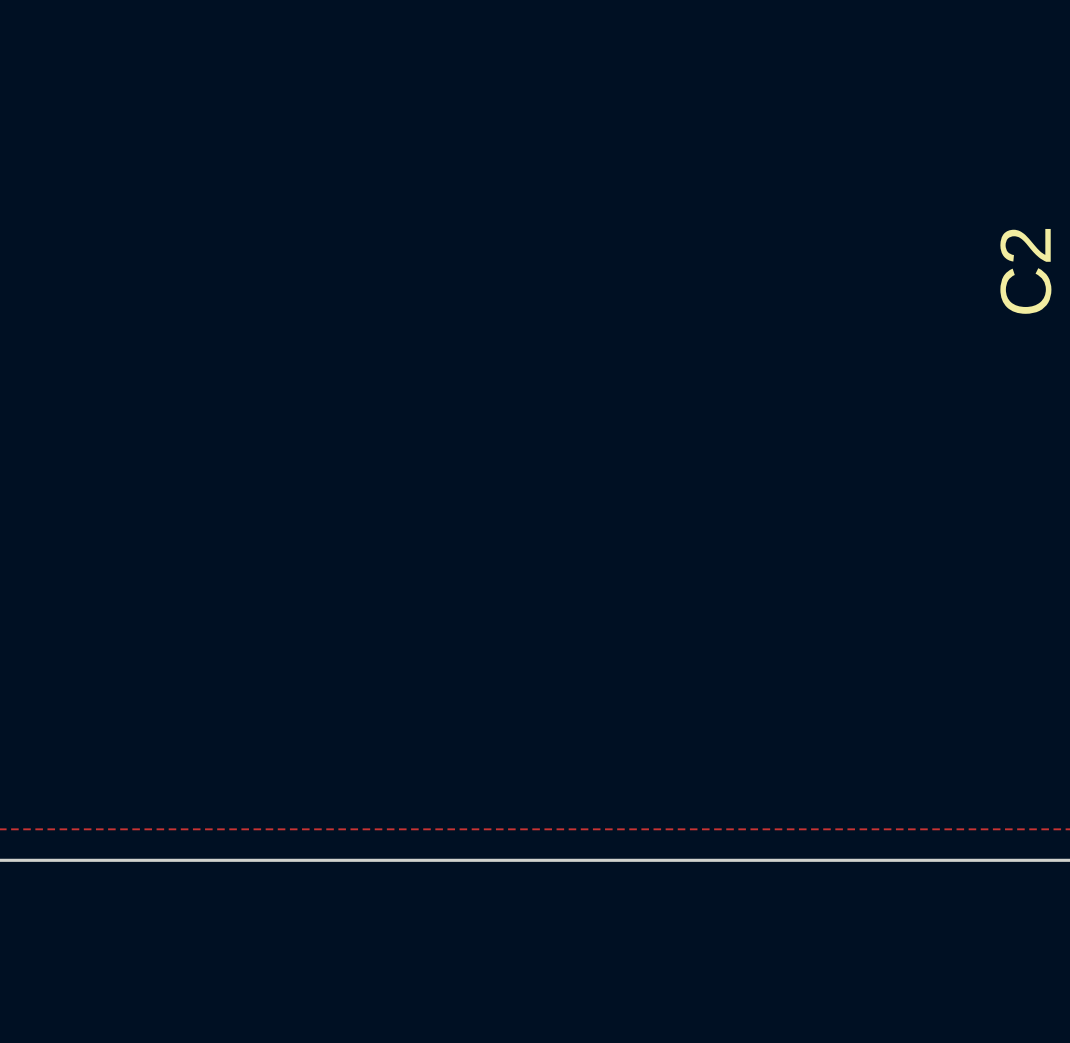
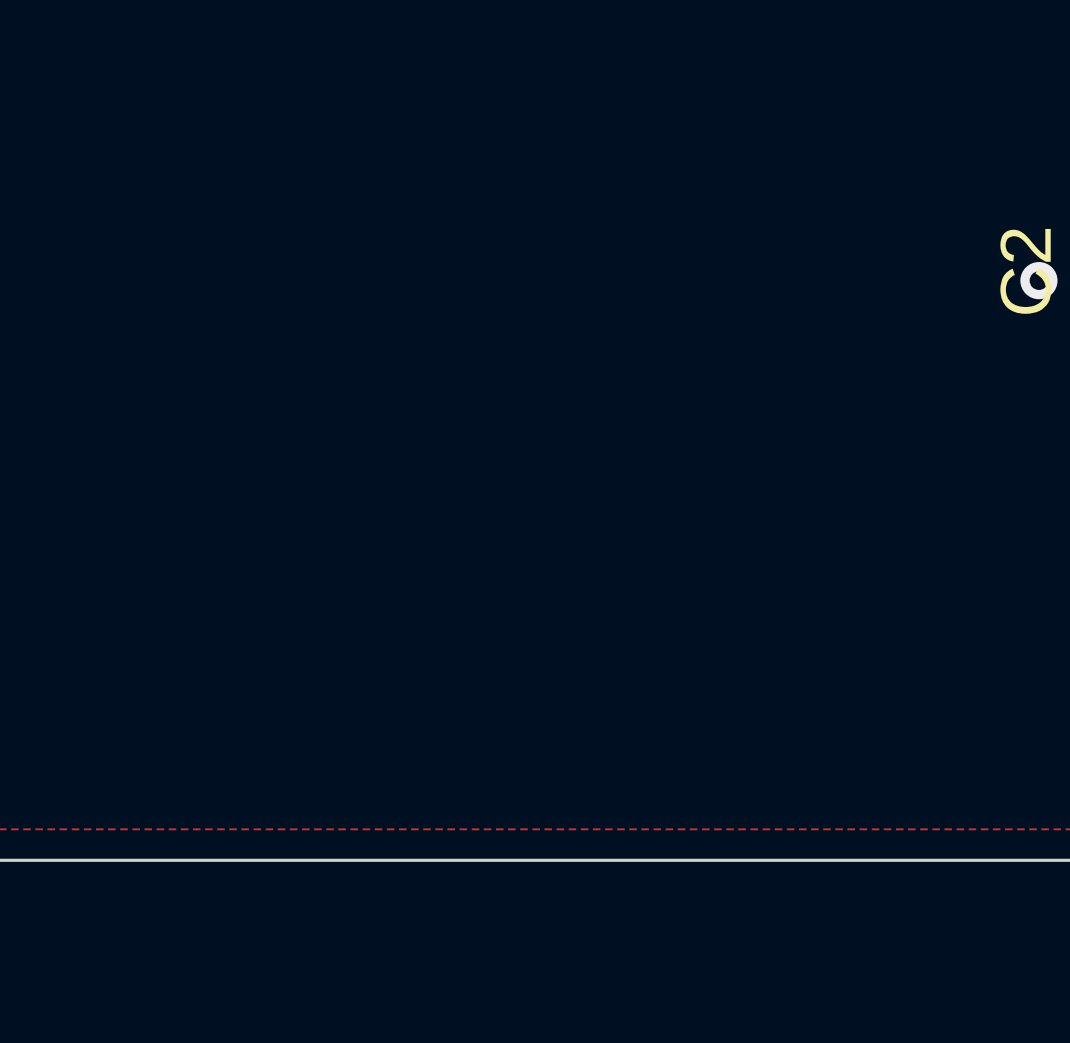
via: none -> (1038, 280)

